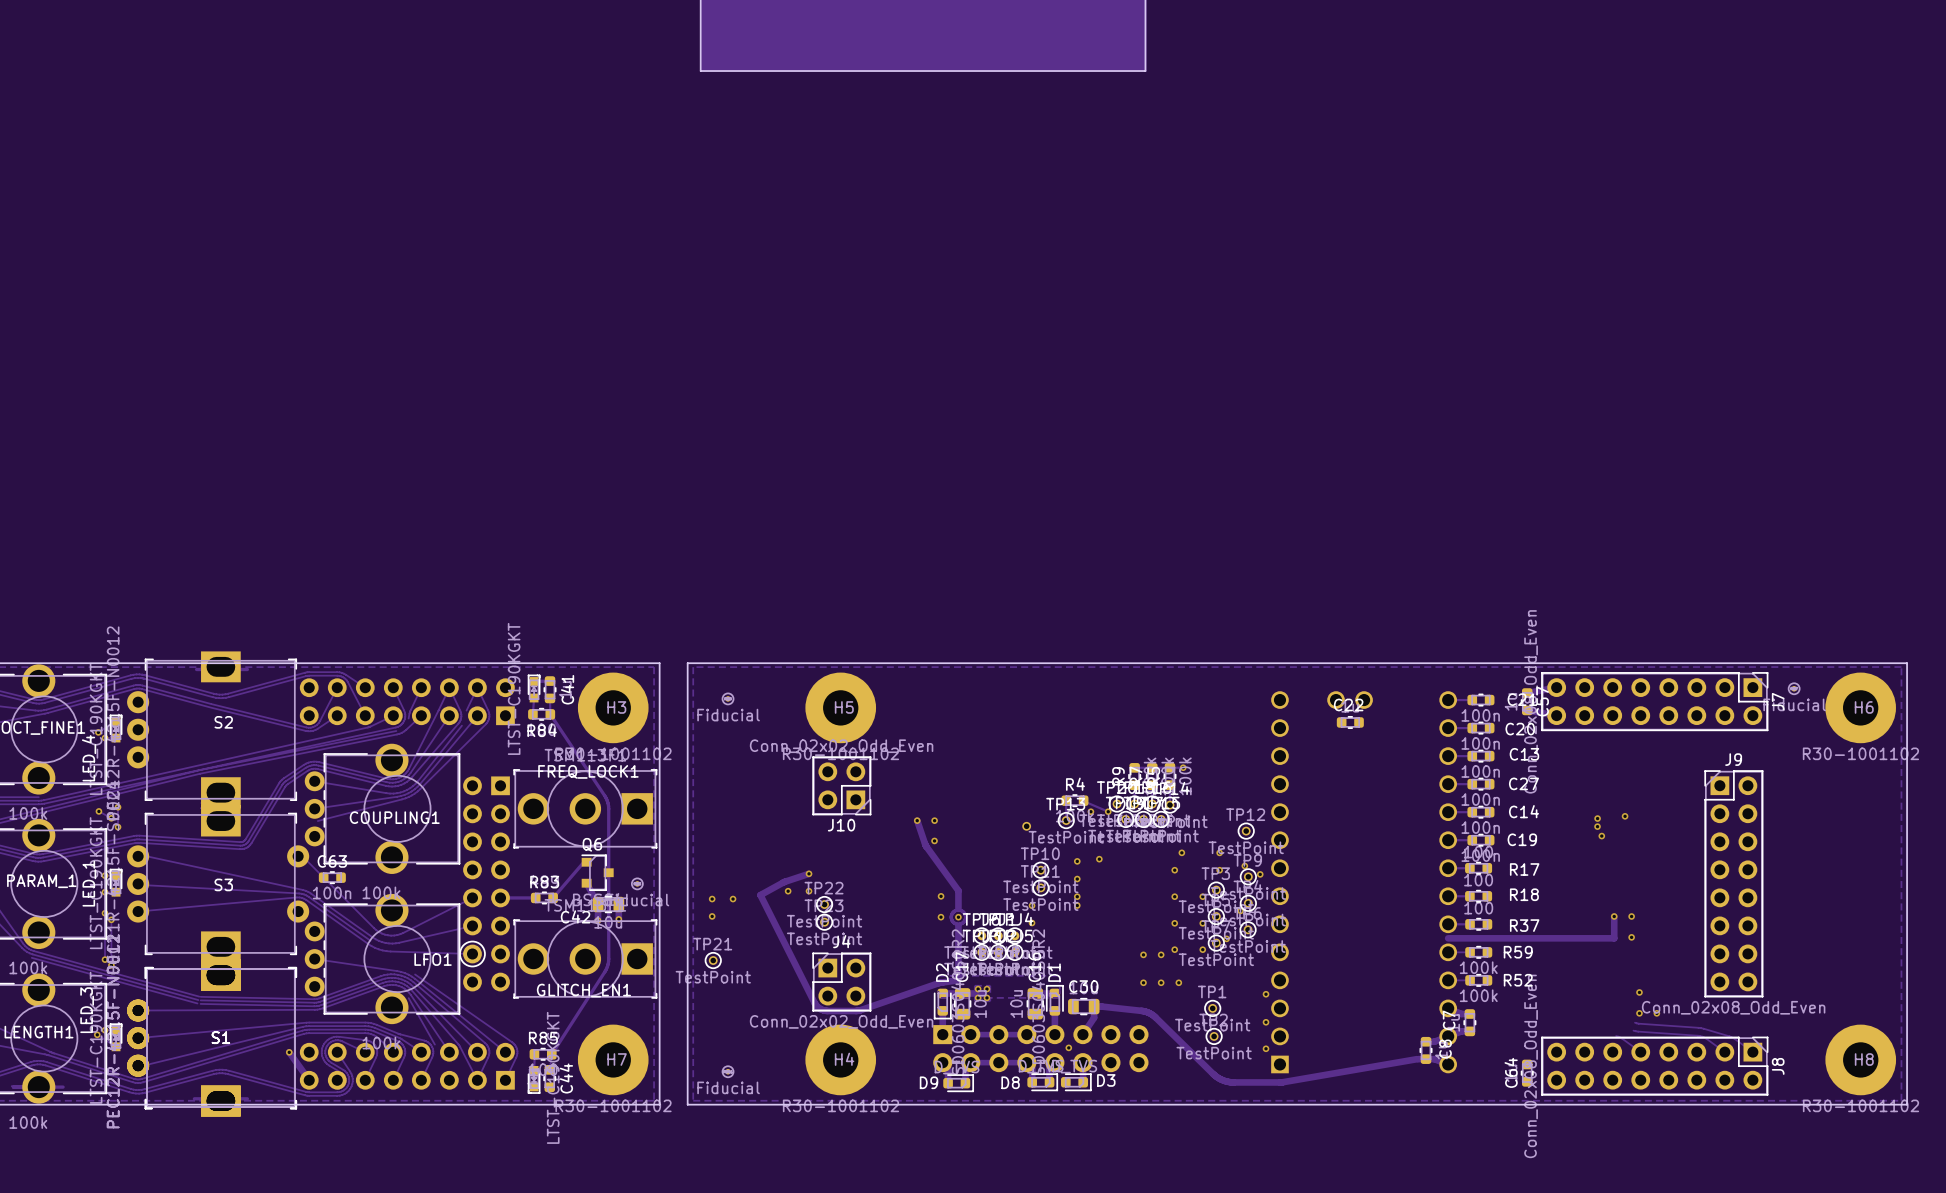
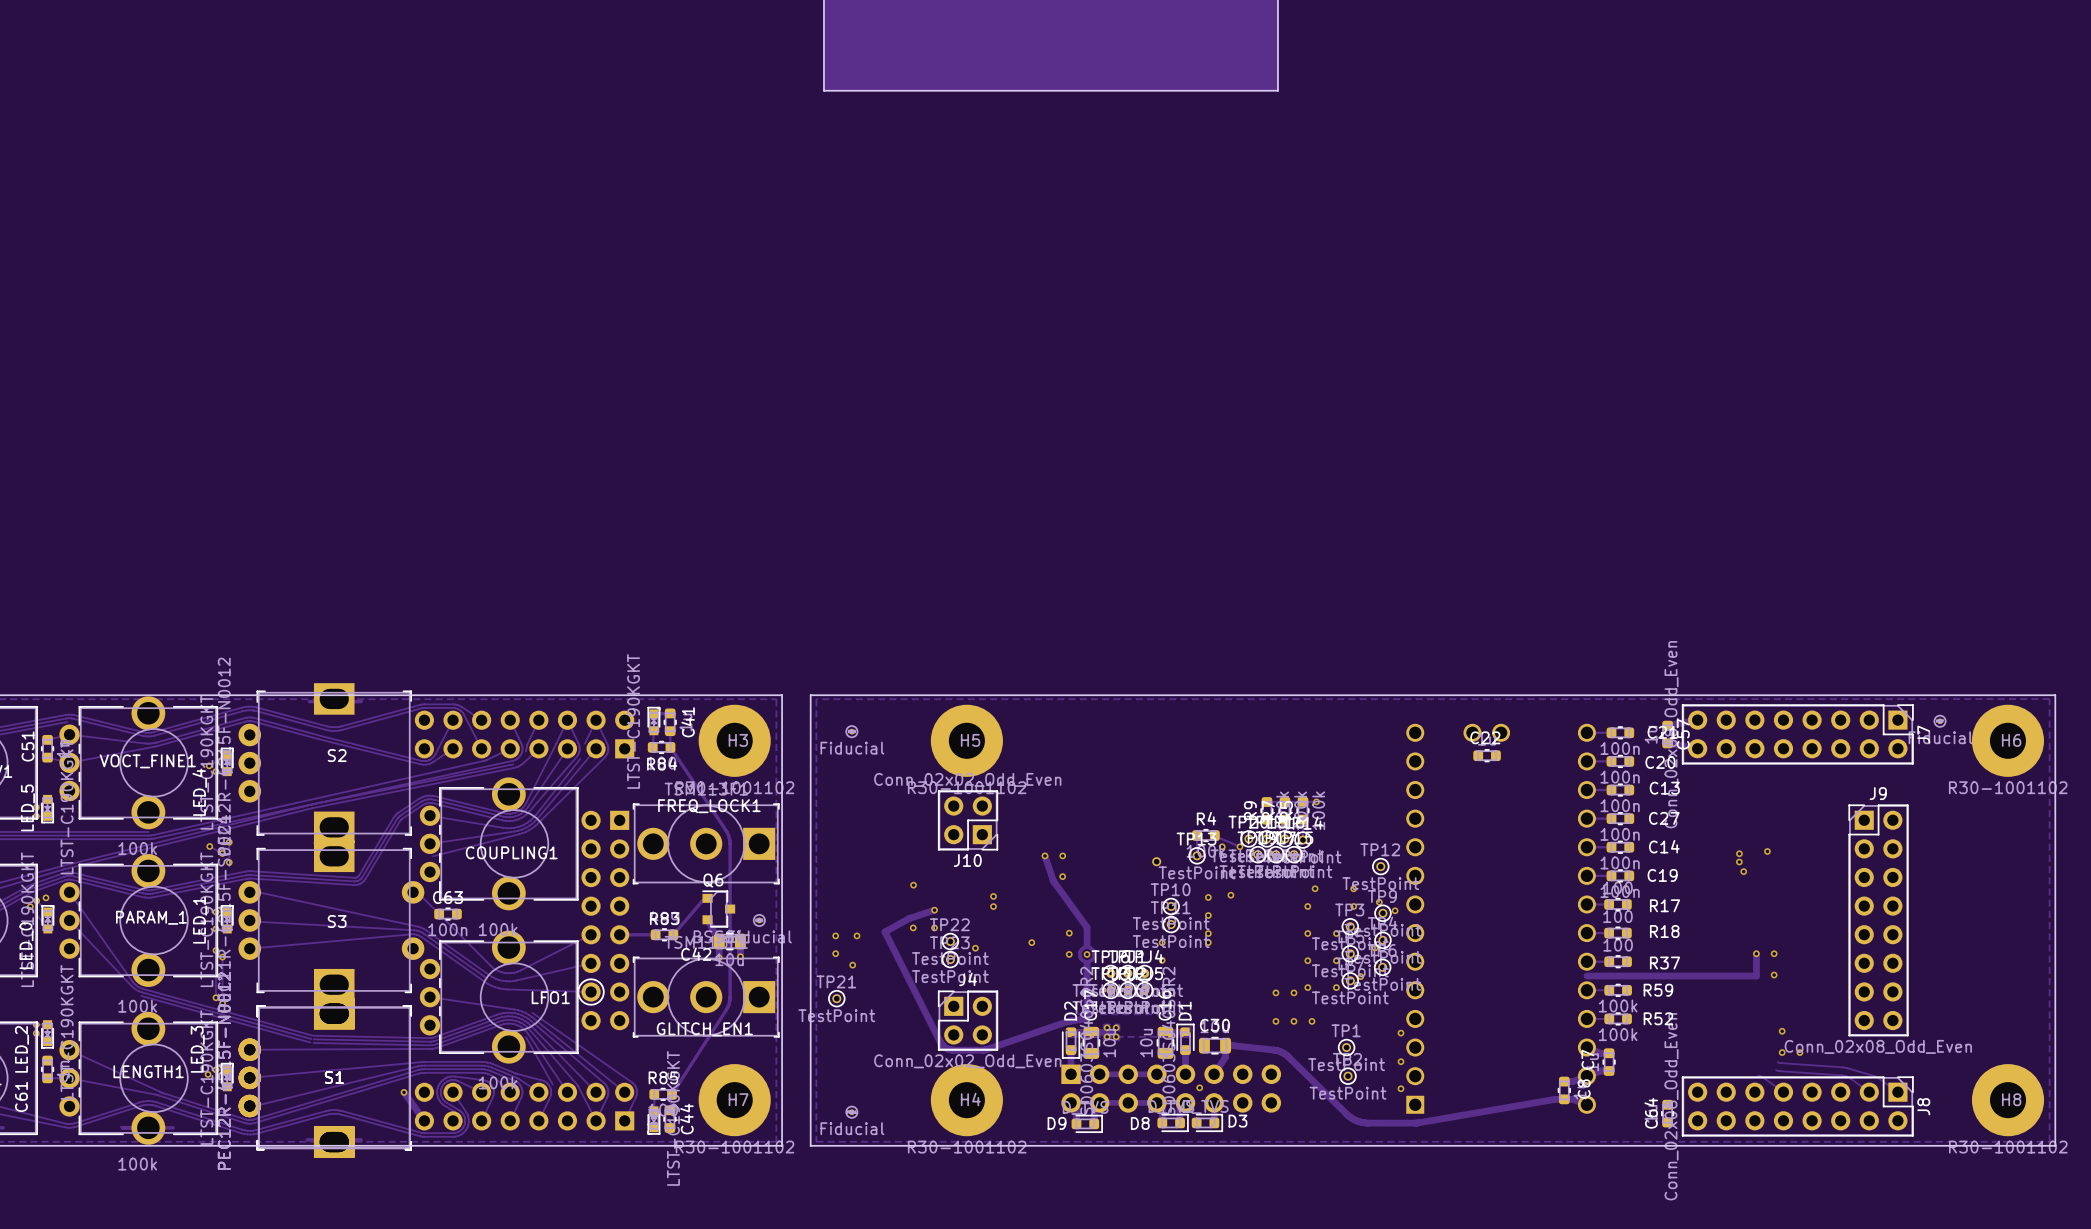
via: none -> (913, 885)
via: none -> (993, 896)
via: none -> (993, 906)
via: none -> (1031, 942)
via: none -> (975, 948)
via: none -> (852, 965)

